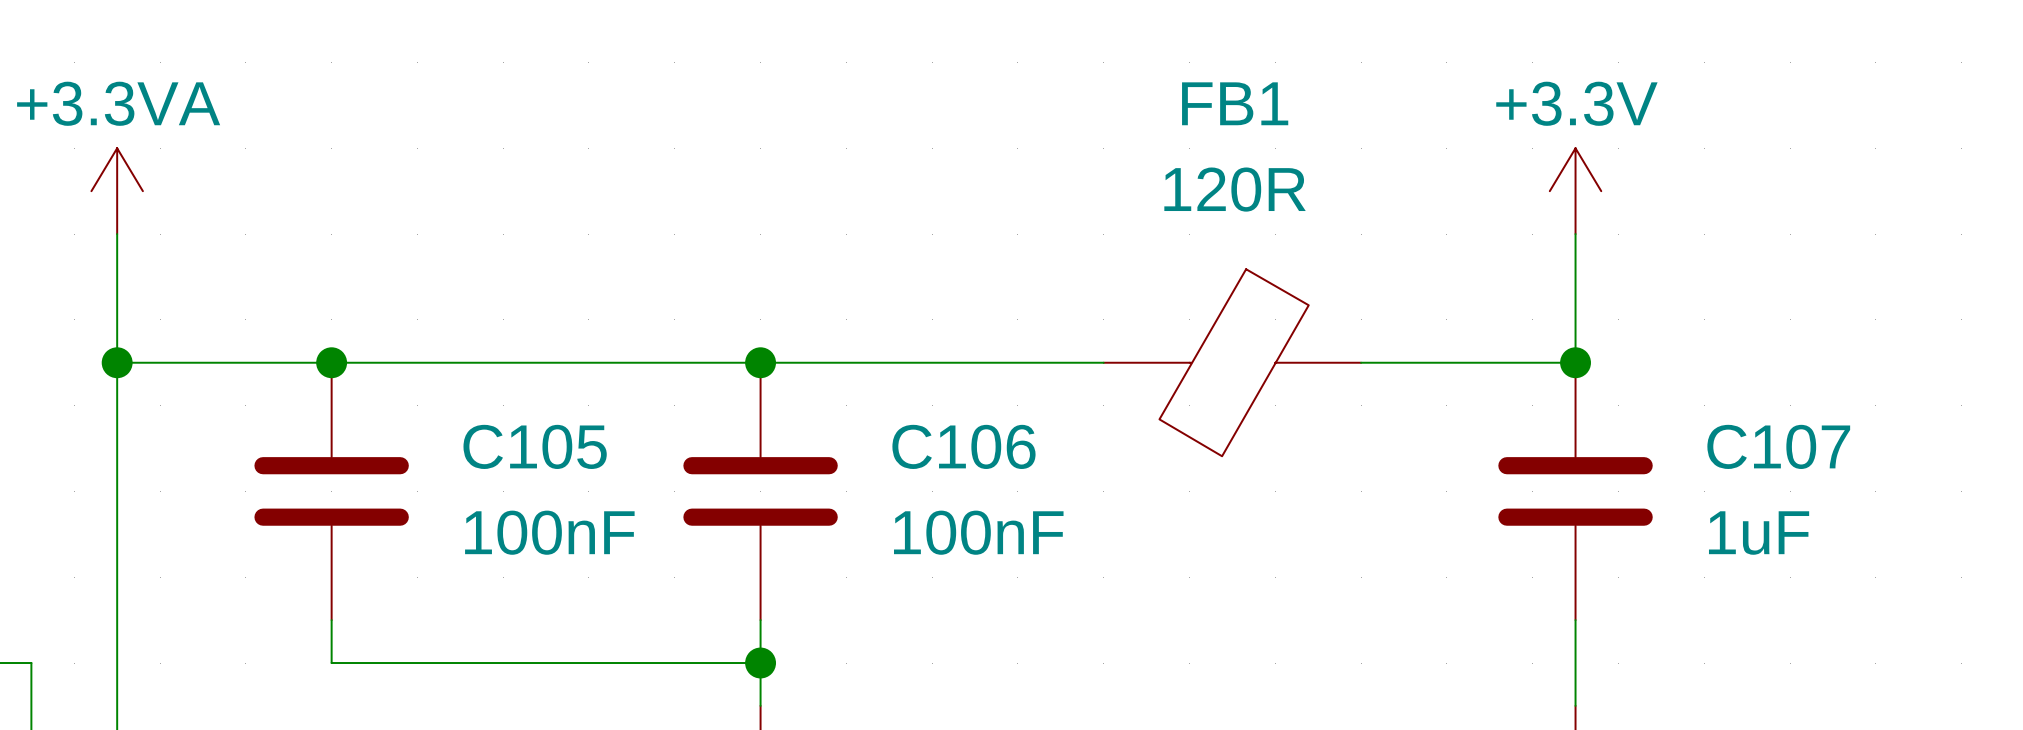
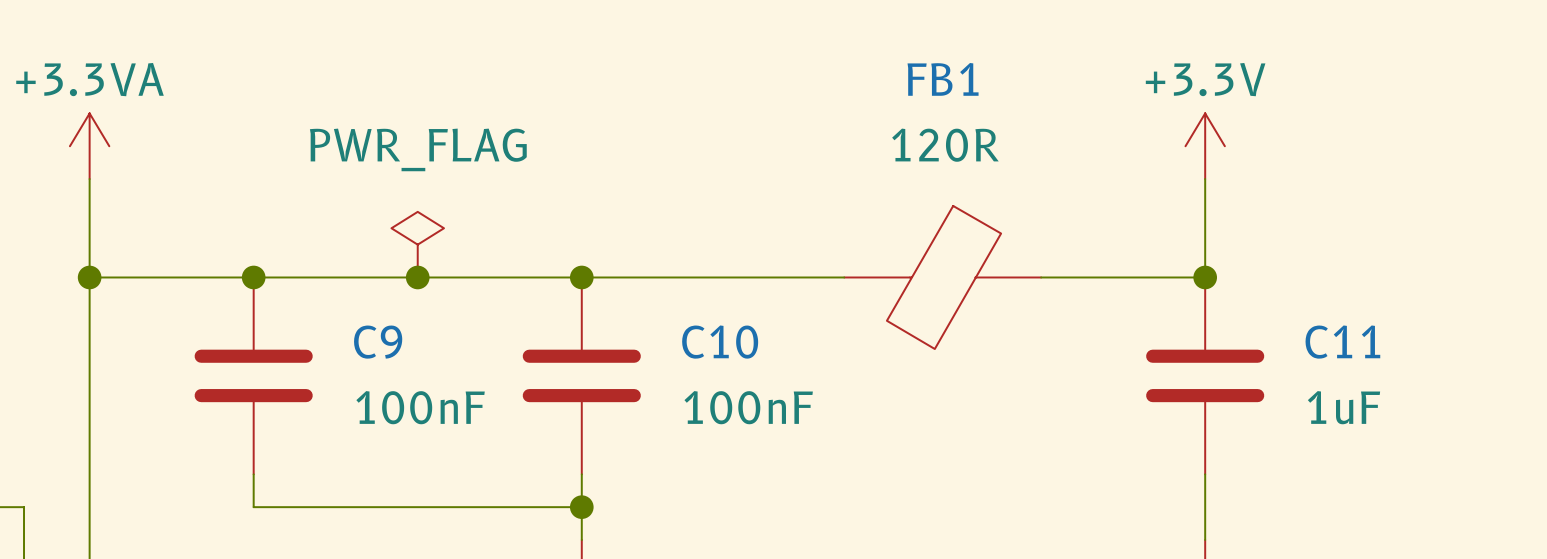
power symbol: none -> PWR_FLAG (417, 244)
junction: none -> (417, 277)
C105 name: C105 (535, 446) -> C9 (378, 342)
C106 name: C106 (963, 446) -> C10 (720, 342)
C107 name: C107 (1778, 446) -> C11 (1342, 342)

